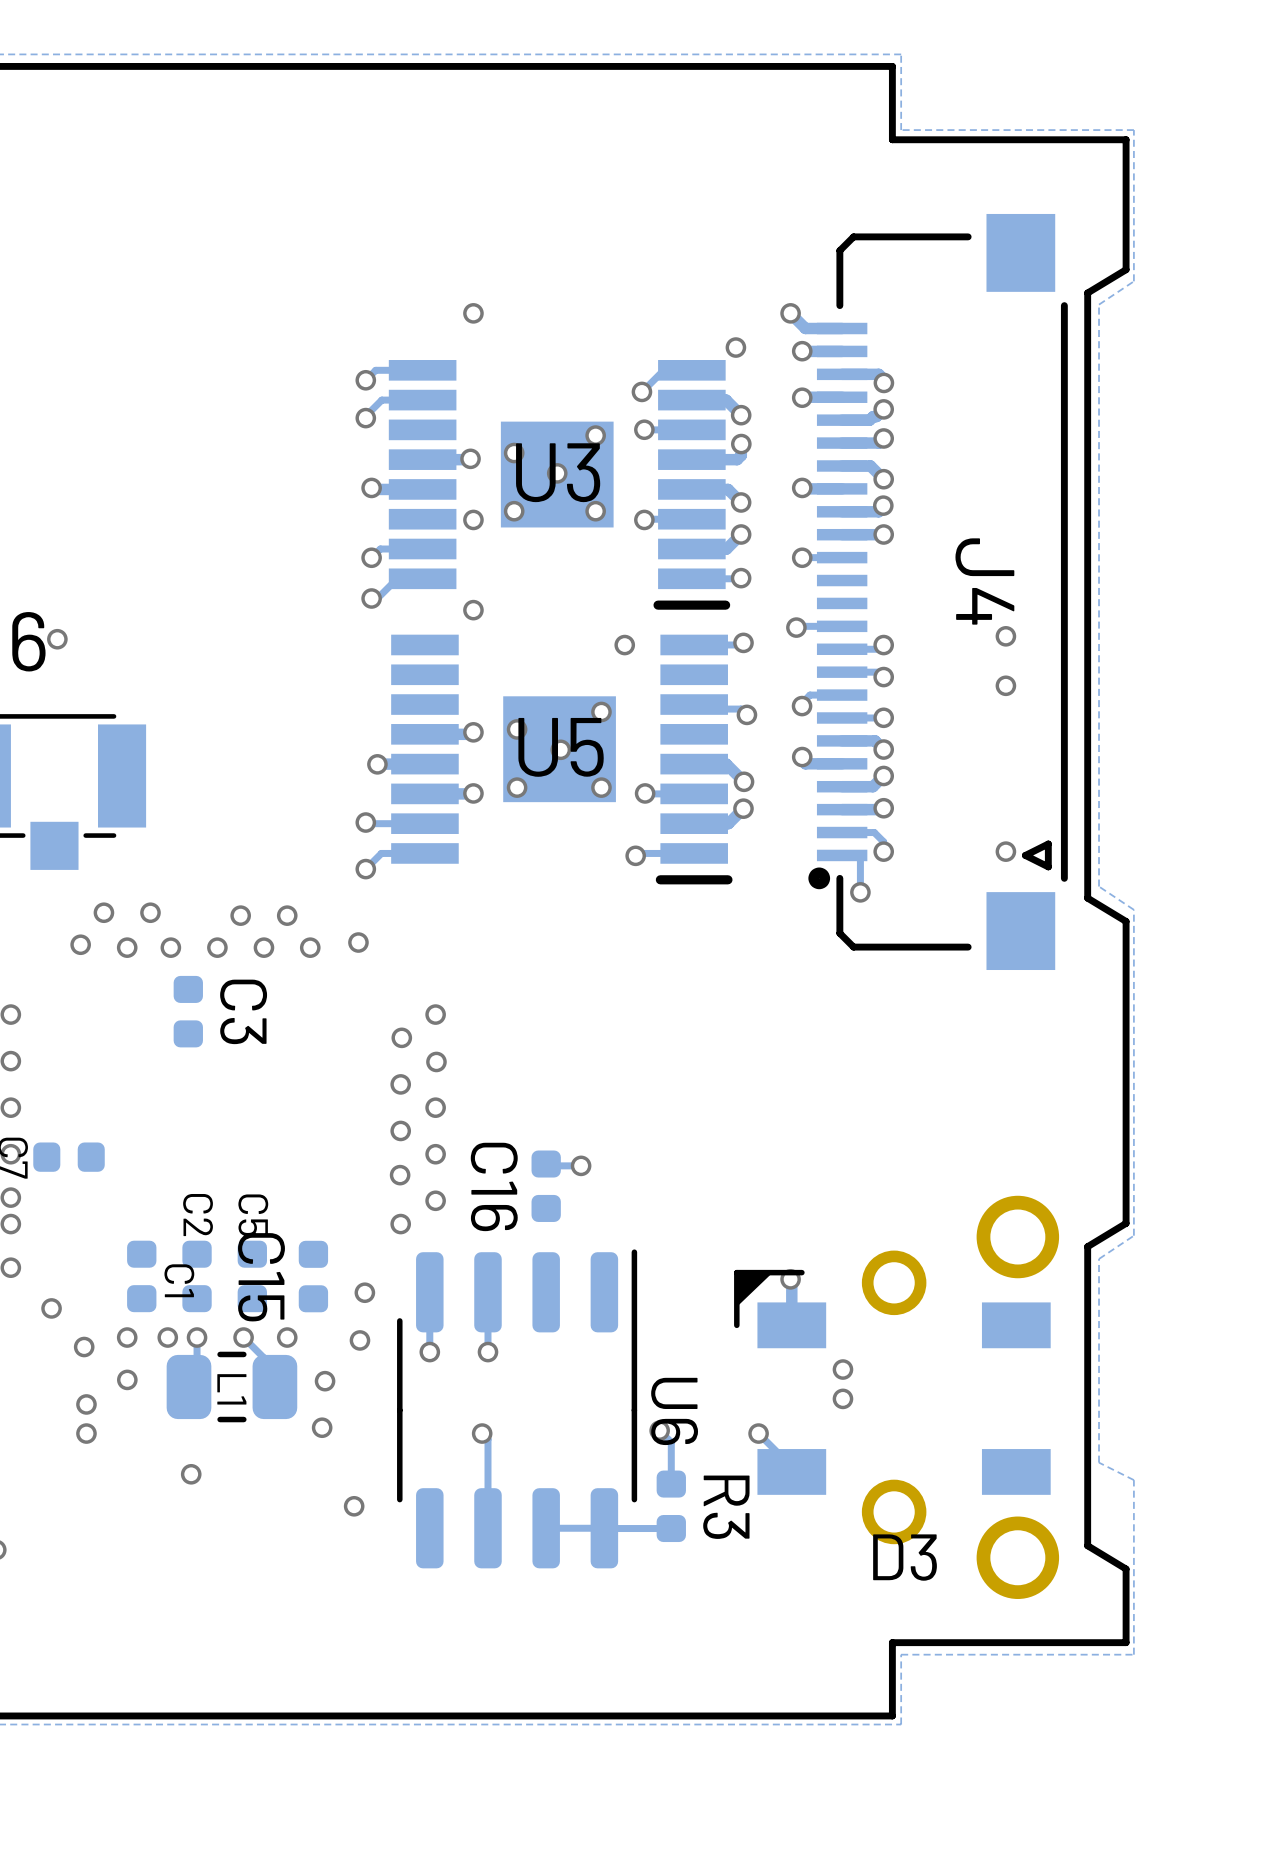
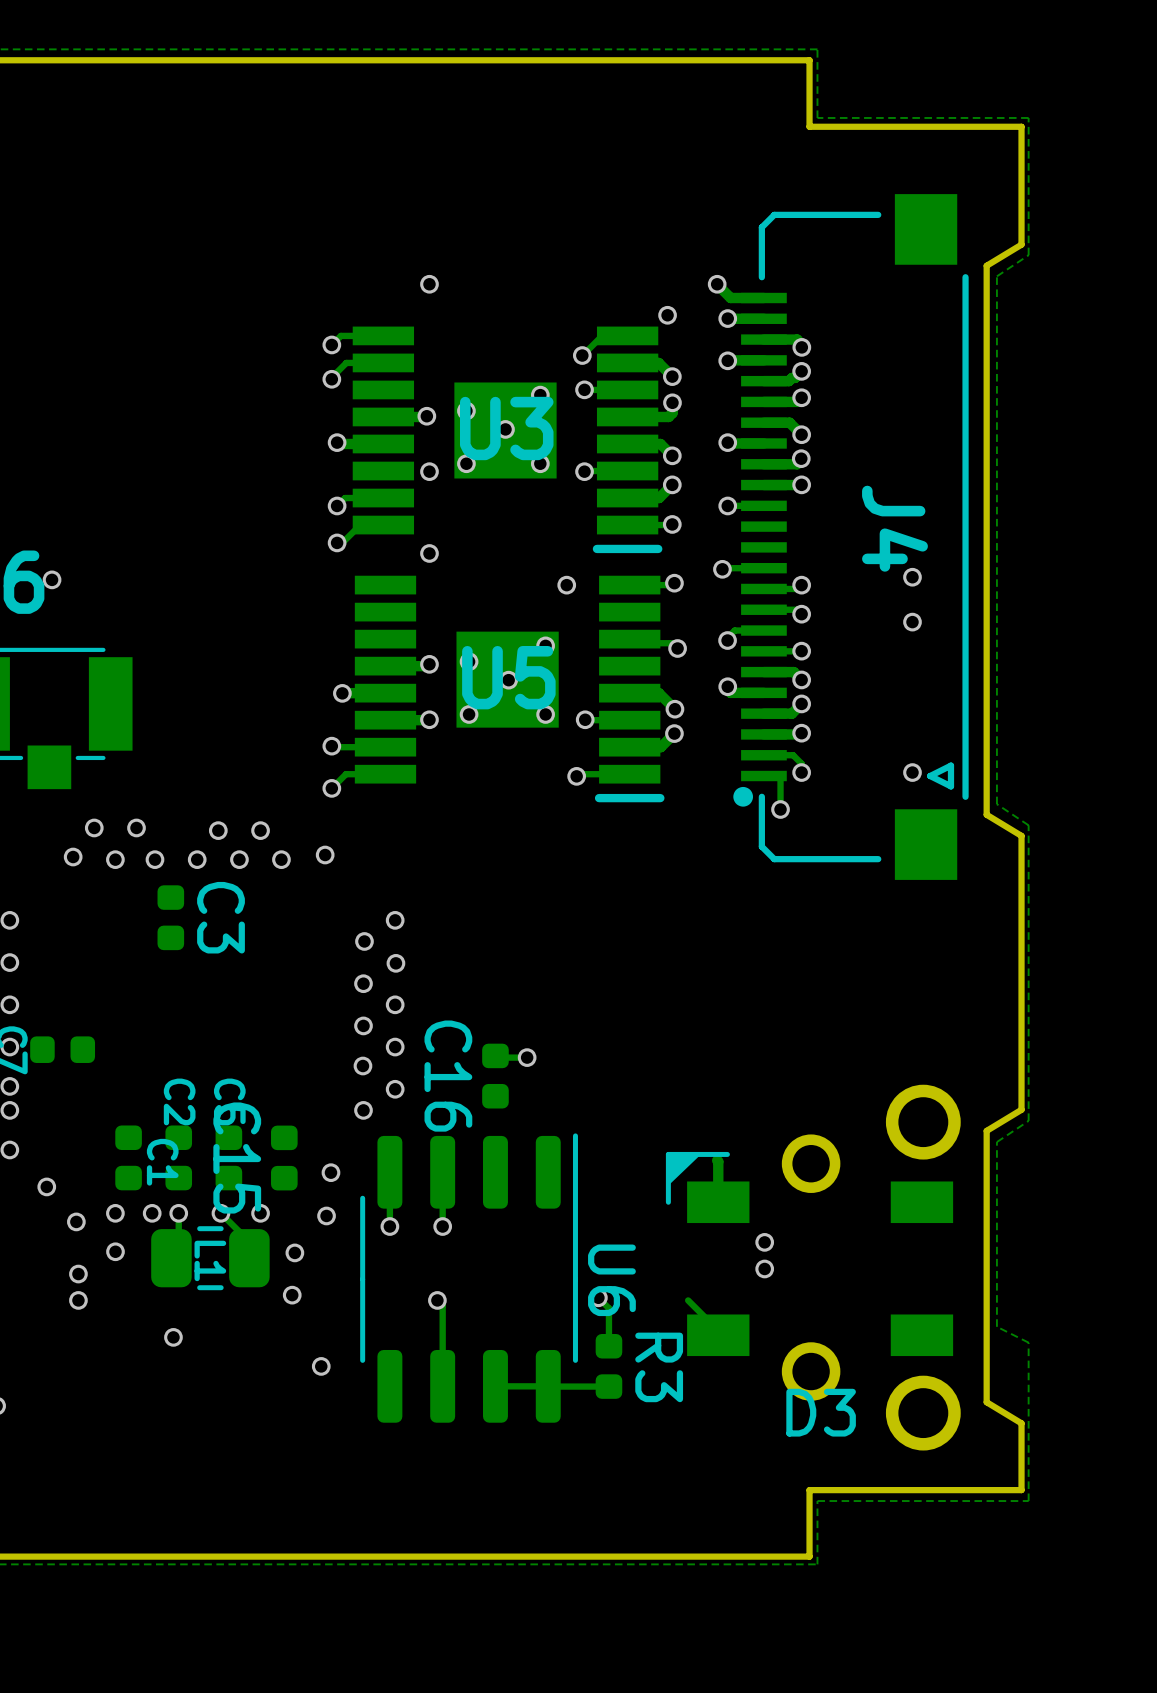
via: (790, 1279) -> none
via: (758, 1433) -> none

